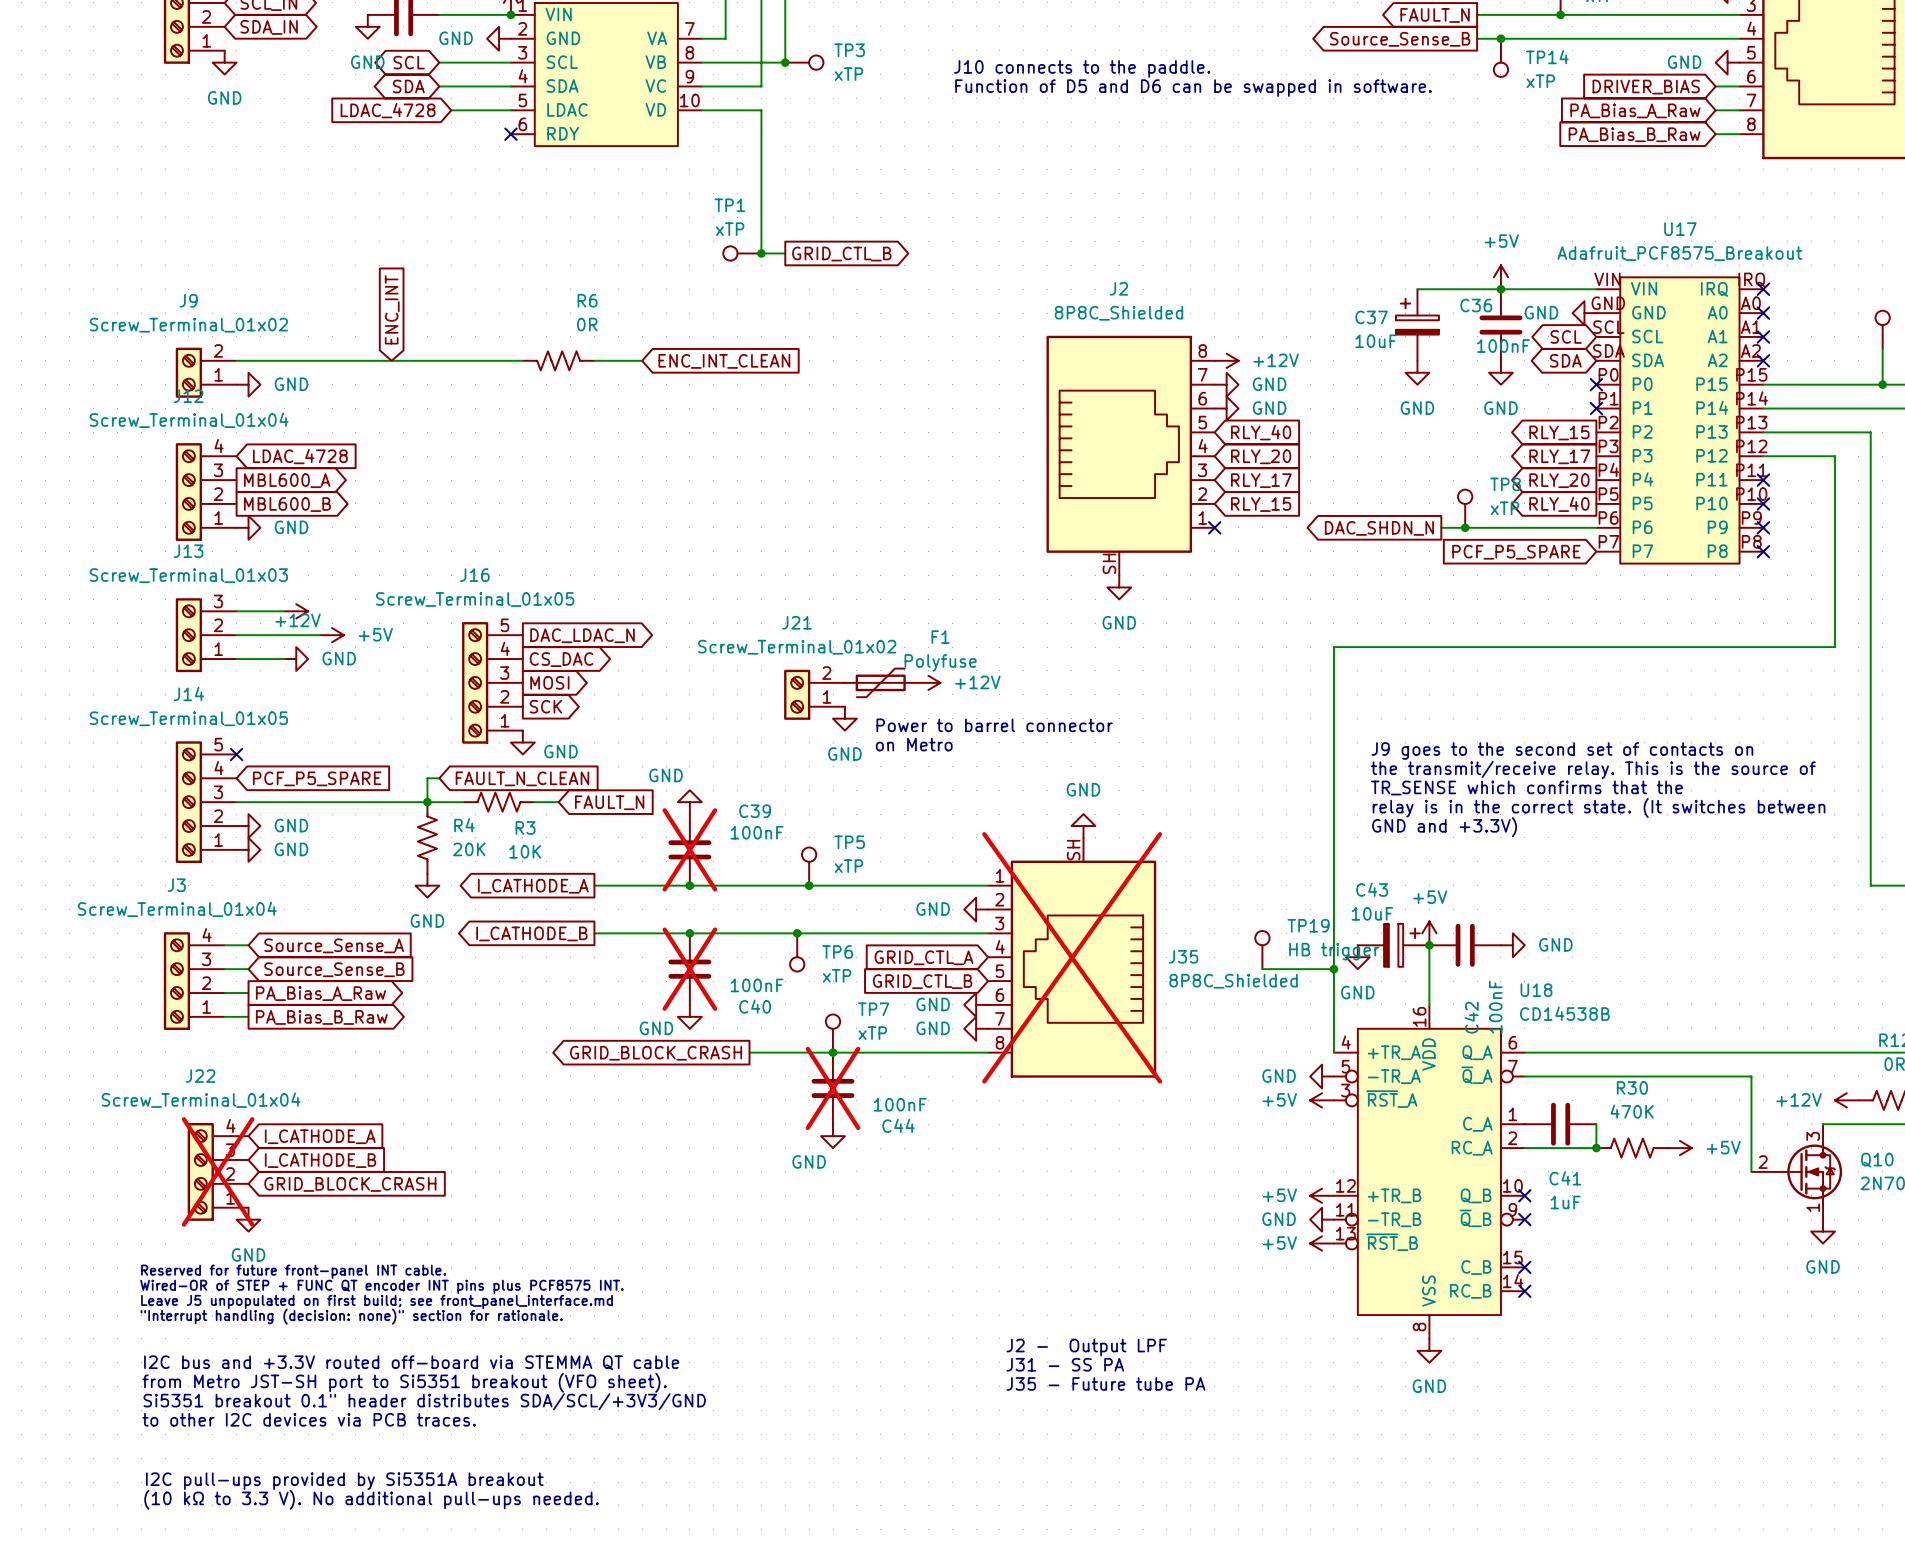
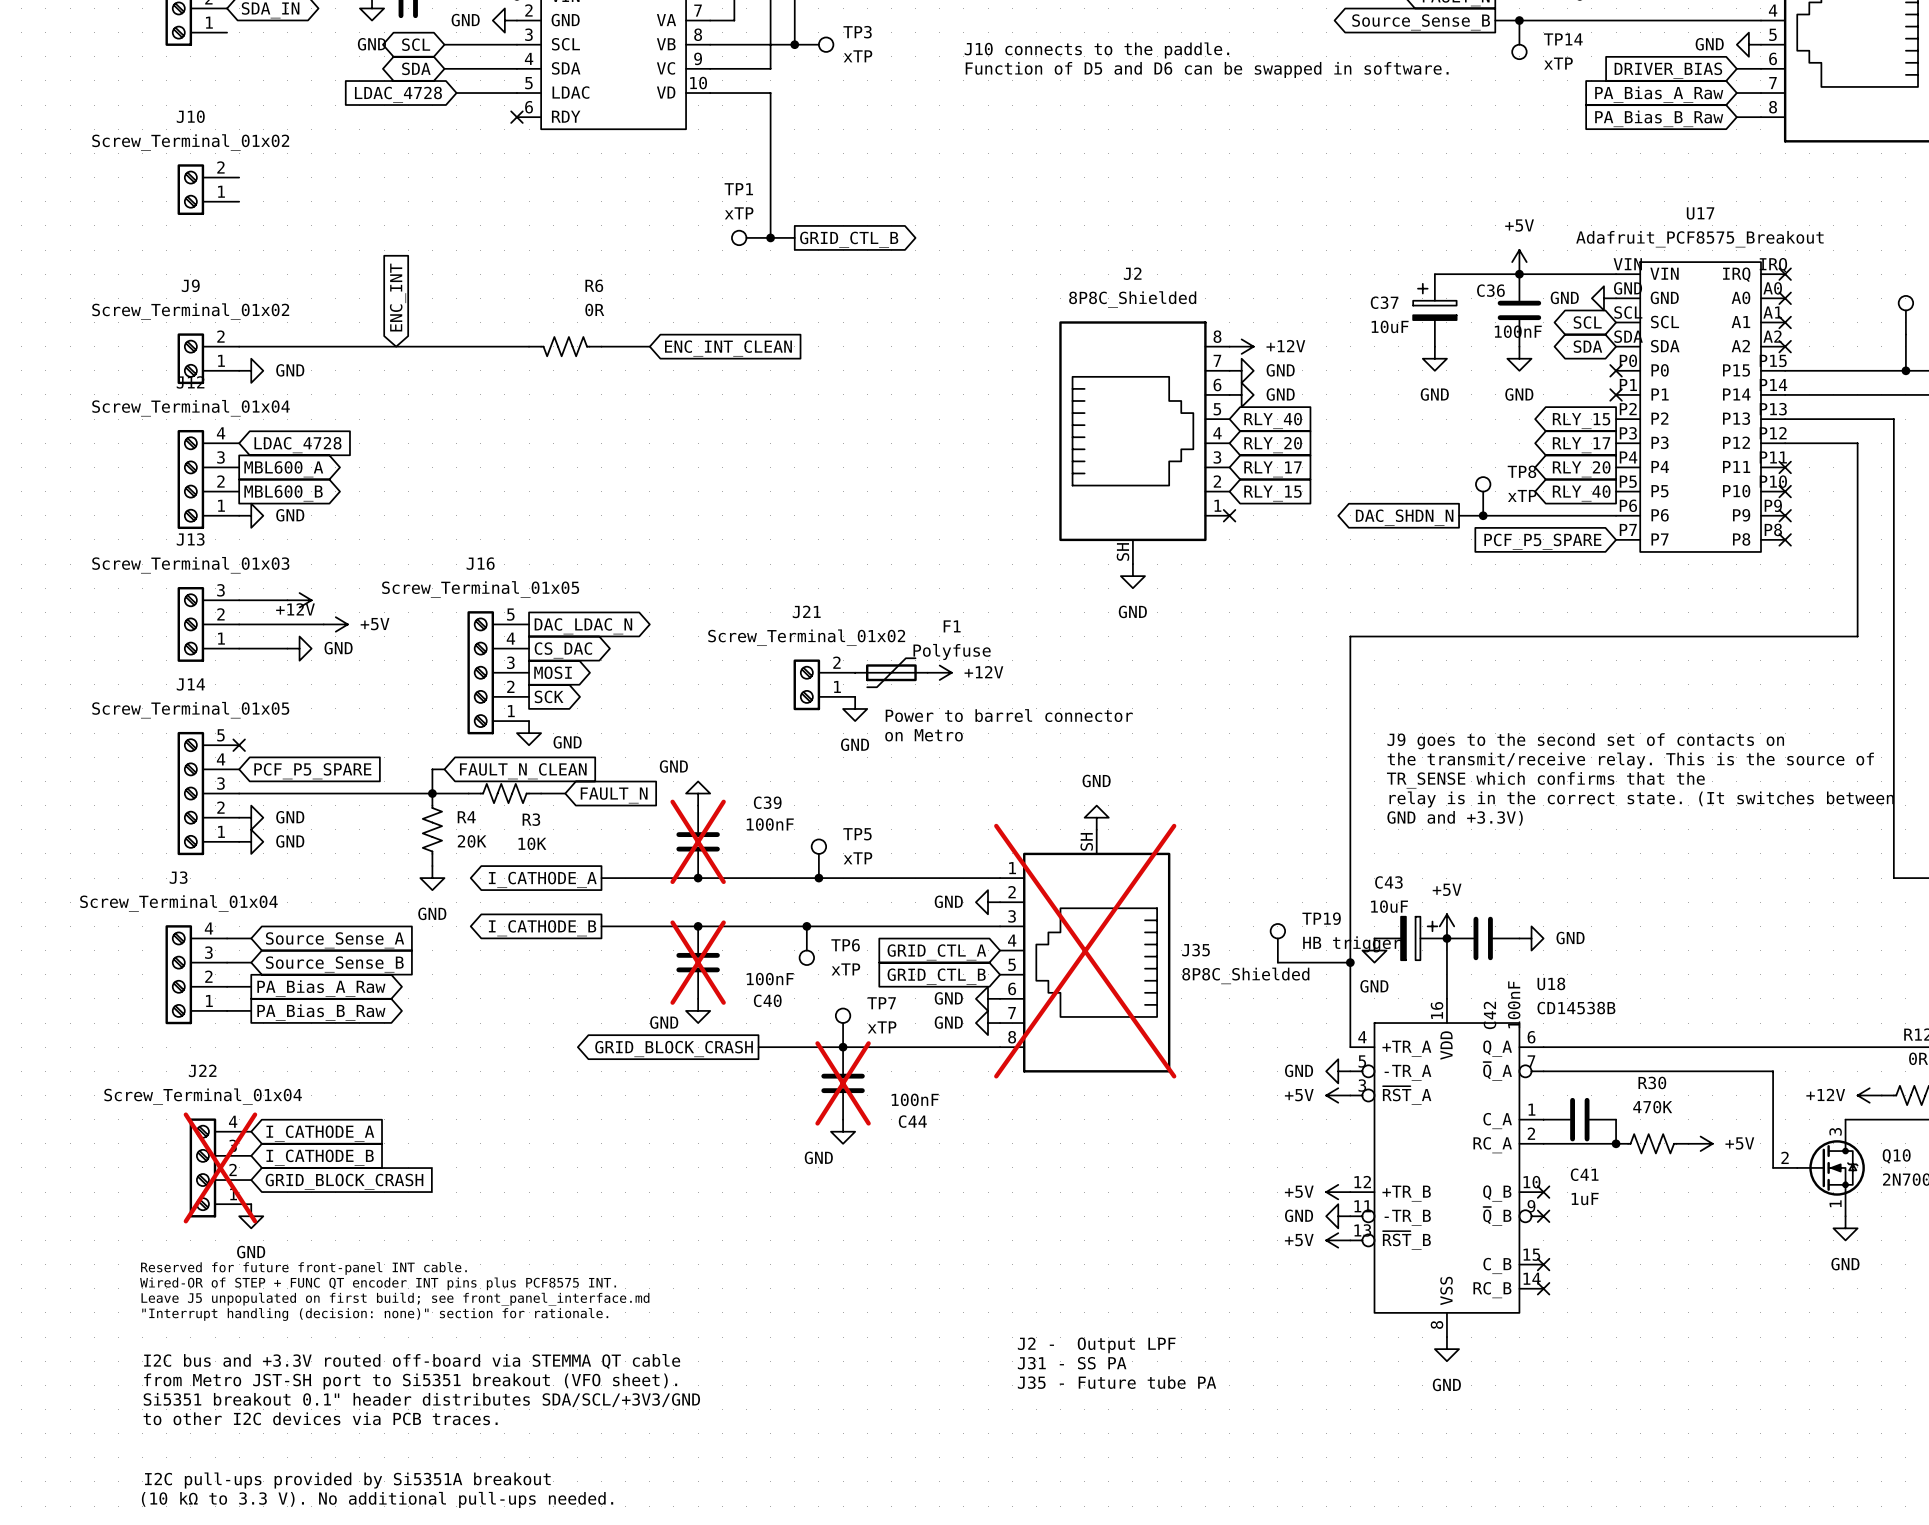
power symbol: GND (224, 62) -> none
J10: none -> Screw_Terminal_01x02 (208, 189)

